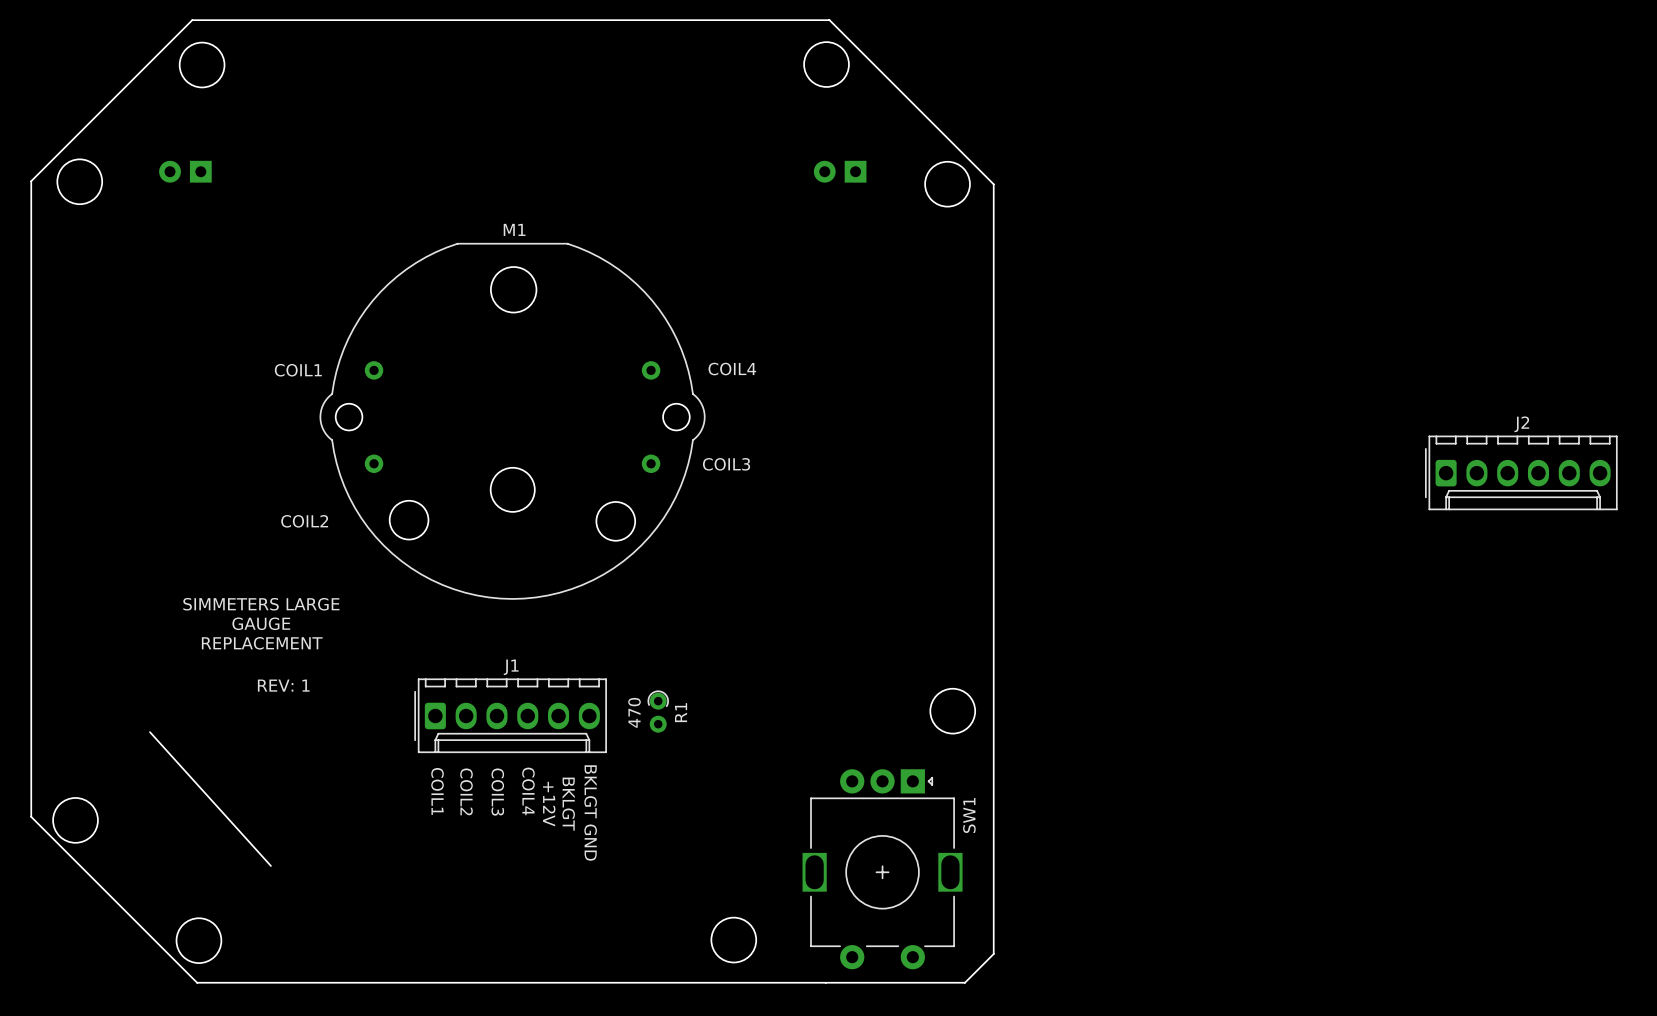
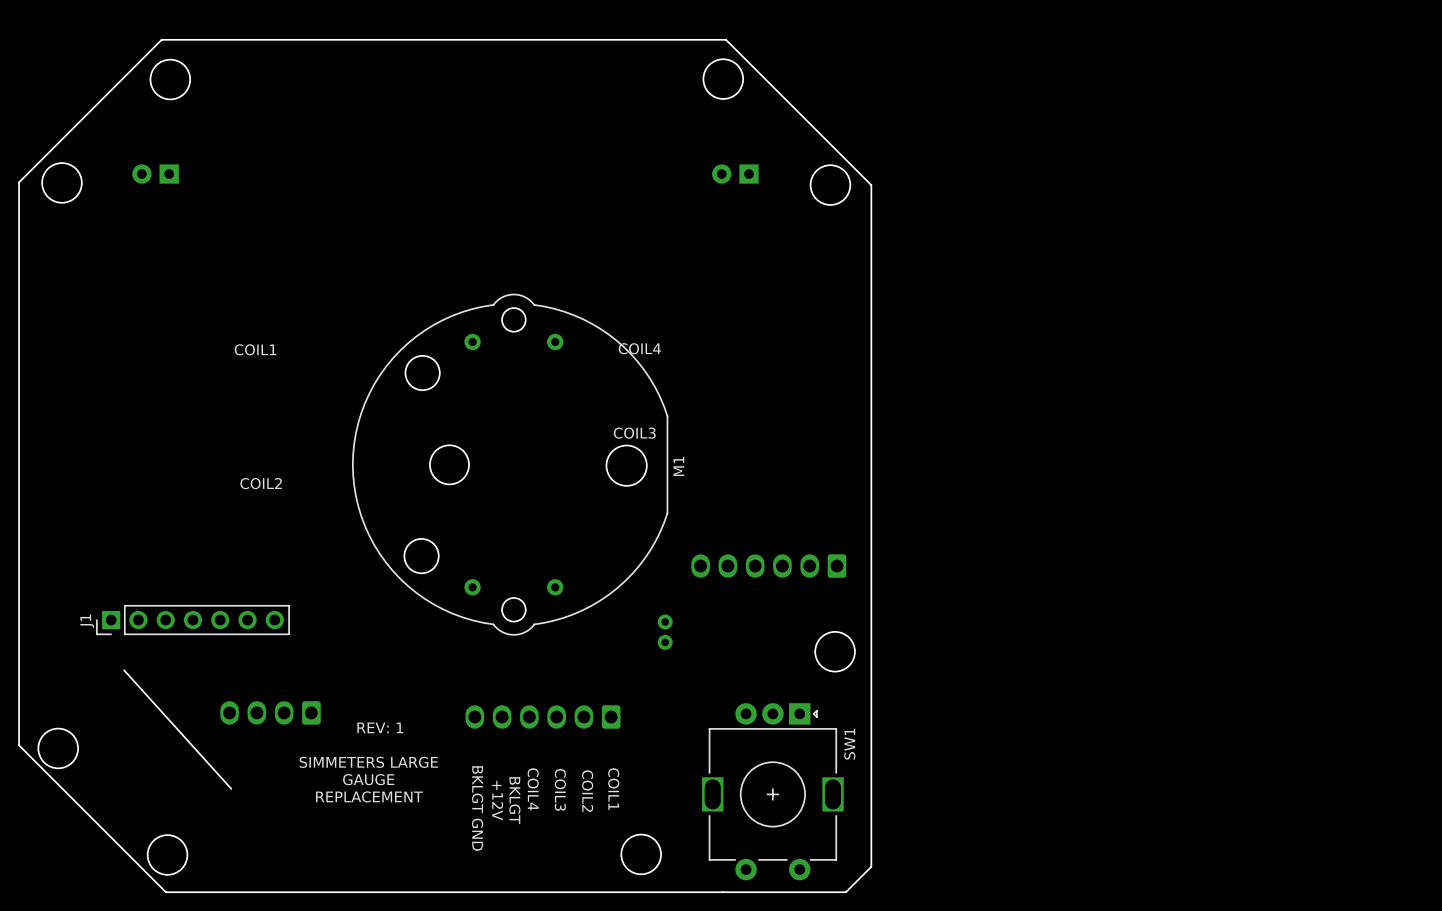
M1 rotation: 0° (512, 421) -> 90° clockwise (510, 464)
J2: (1521, 472) -> none
text position: SIMMETERS LARGE (261, 604) -> SIMMETERS LARGE (368, 762)
part: none -> (768, 566)
text position: GAUGE (261, 623) -> GAUGE (368, 779)
text position: REPLACEMENT (262, 643) -> REPLACEMENT (369, 796)
J1 name position: J1 (511, 667) -> J1 (87, 621)
J1 footprint: [414, 678, 607, 753] -> [96, 605, 290, 635]
text position: REV: 1 (283, 685) -> REV: 1 (380, 727)
R1 side: top (658, 711) -> bottom (665, 632)
part: none -> (270, 712)
part: none -> (543, 717)
text position: COIL1 (437, 791) -> COIL1 (613, 789)
text position: COIL2 (466, 791) -> COIL2 (587, 791)
text position: COIL4 (528, 791) -> COIL4 (533, 789)
text position: COIL3 (497, 792) -> COIL3 (560, 789)
text position: +12V (549, 804) -> +12V (497, 800)
text position: BKLGT (568, 804) -> BKLGT (514, 800)
text position: BKLGT GND (590, 813) -> BKLGT GND (477, 808)

